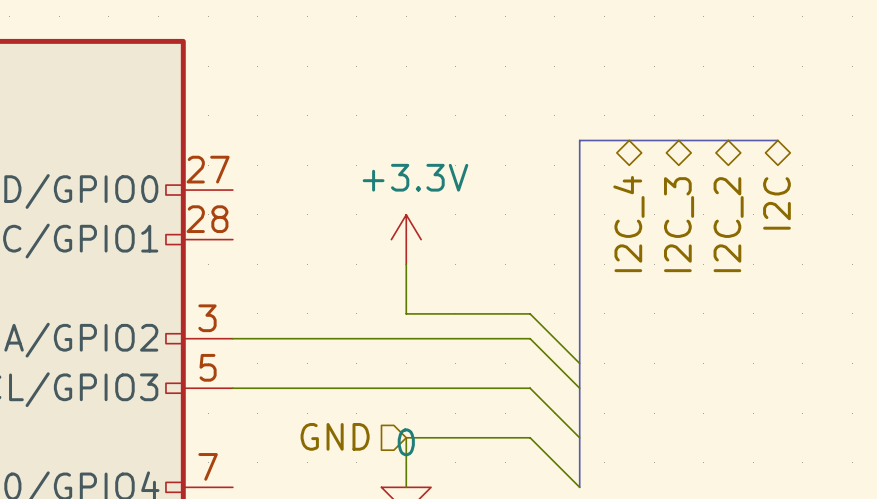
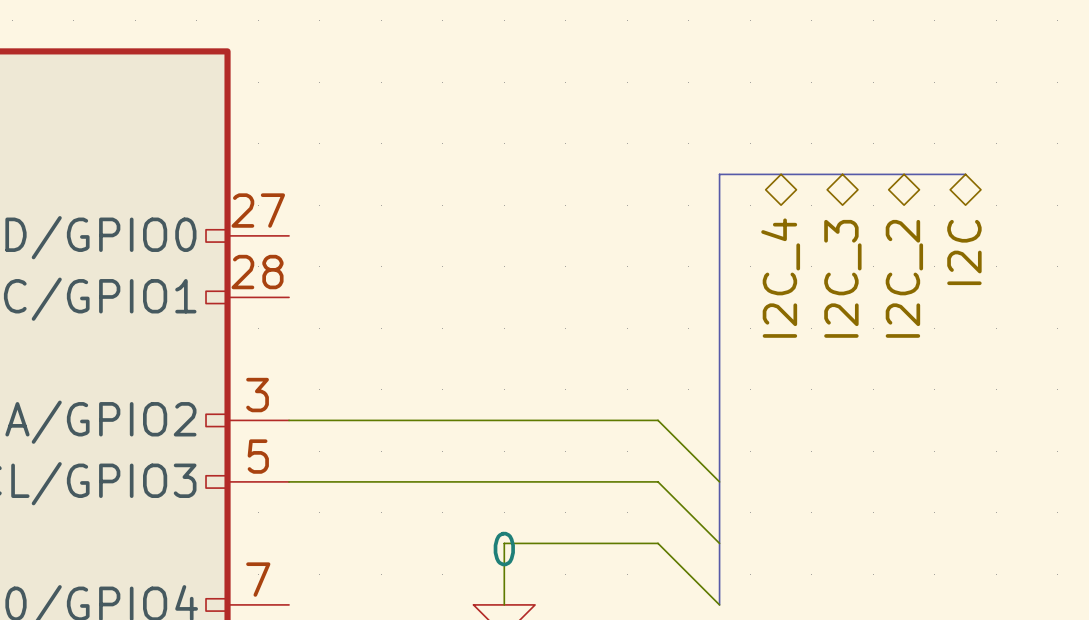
power symbol: +3.3V (406, 239) -> none
wire: (406, 264) (406, 313) (530, 313) (579, 363) -> none
hierarchical label: GND (335, 436) -> none

